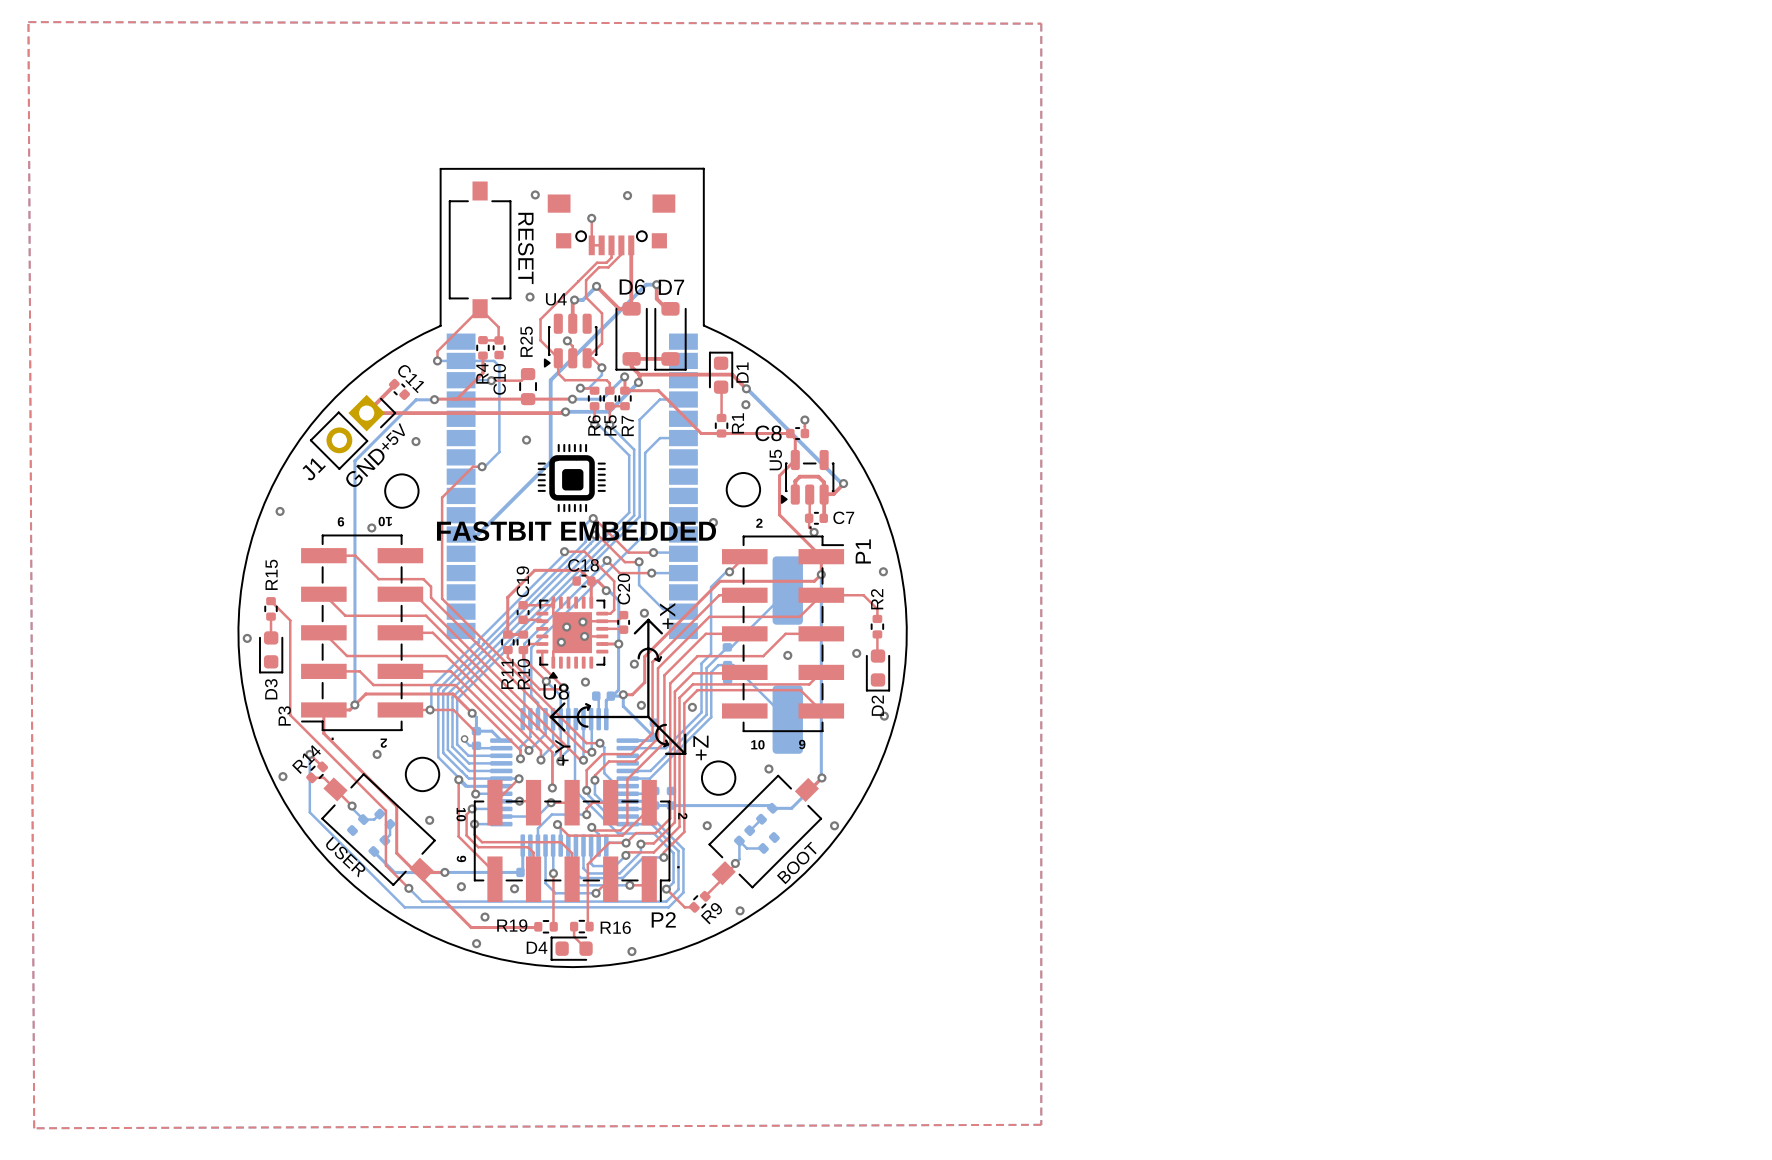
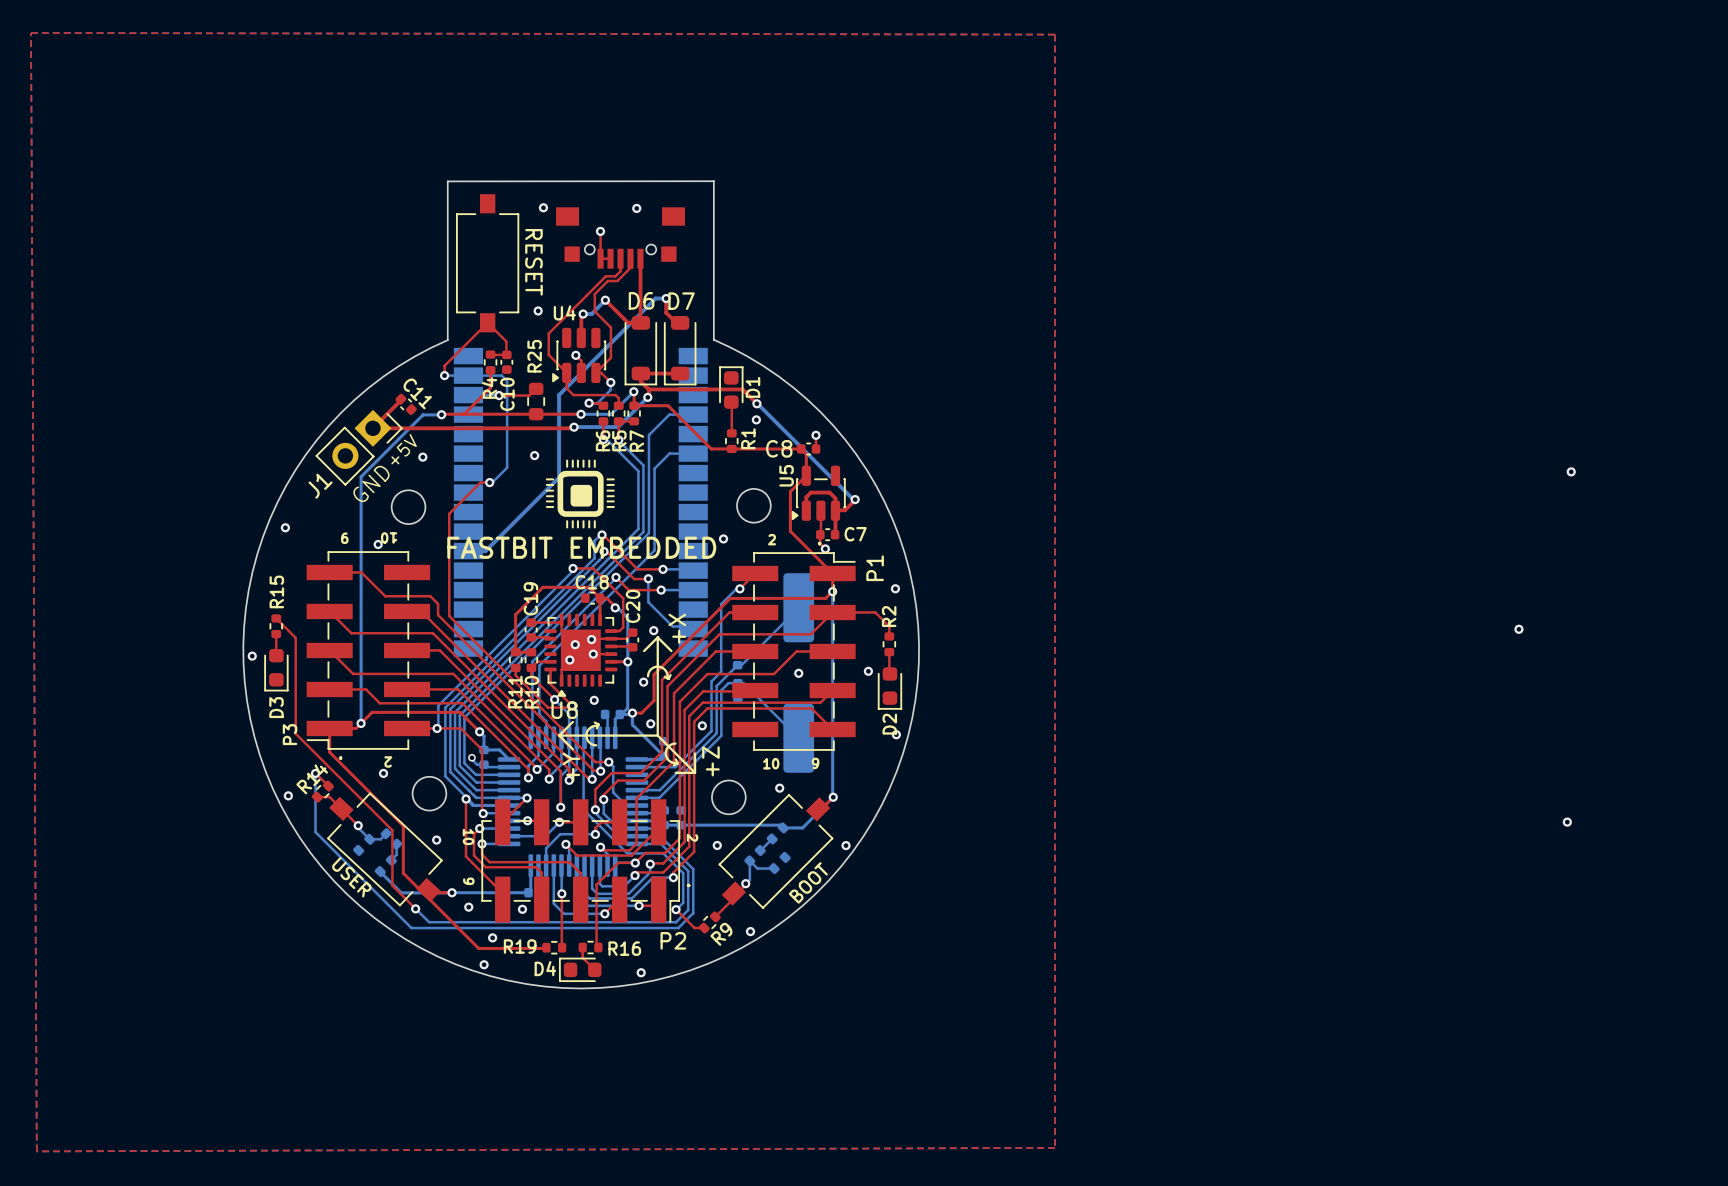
via: none -> (1571, 471)
via: none -> (1518, 629)
via: none -> (1567, 822)

